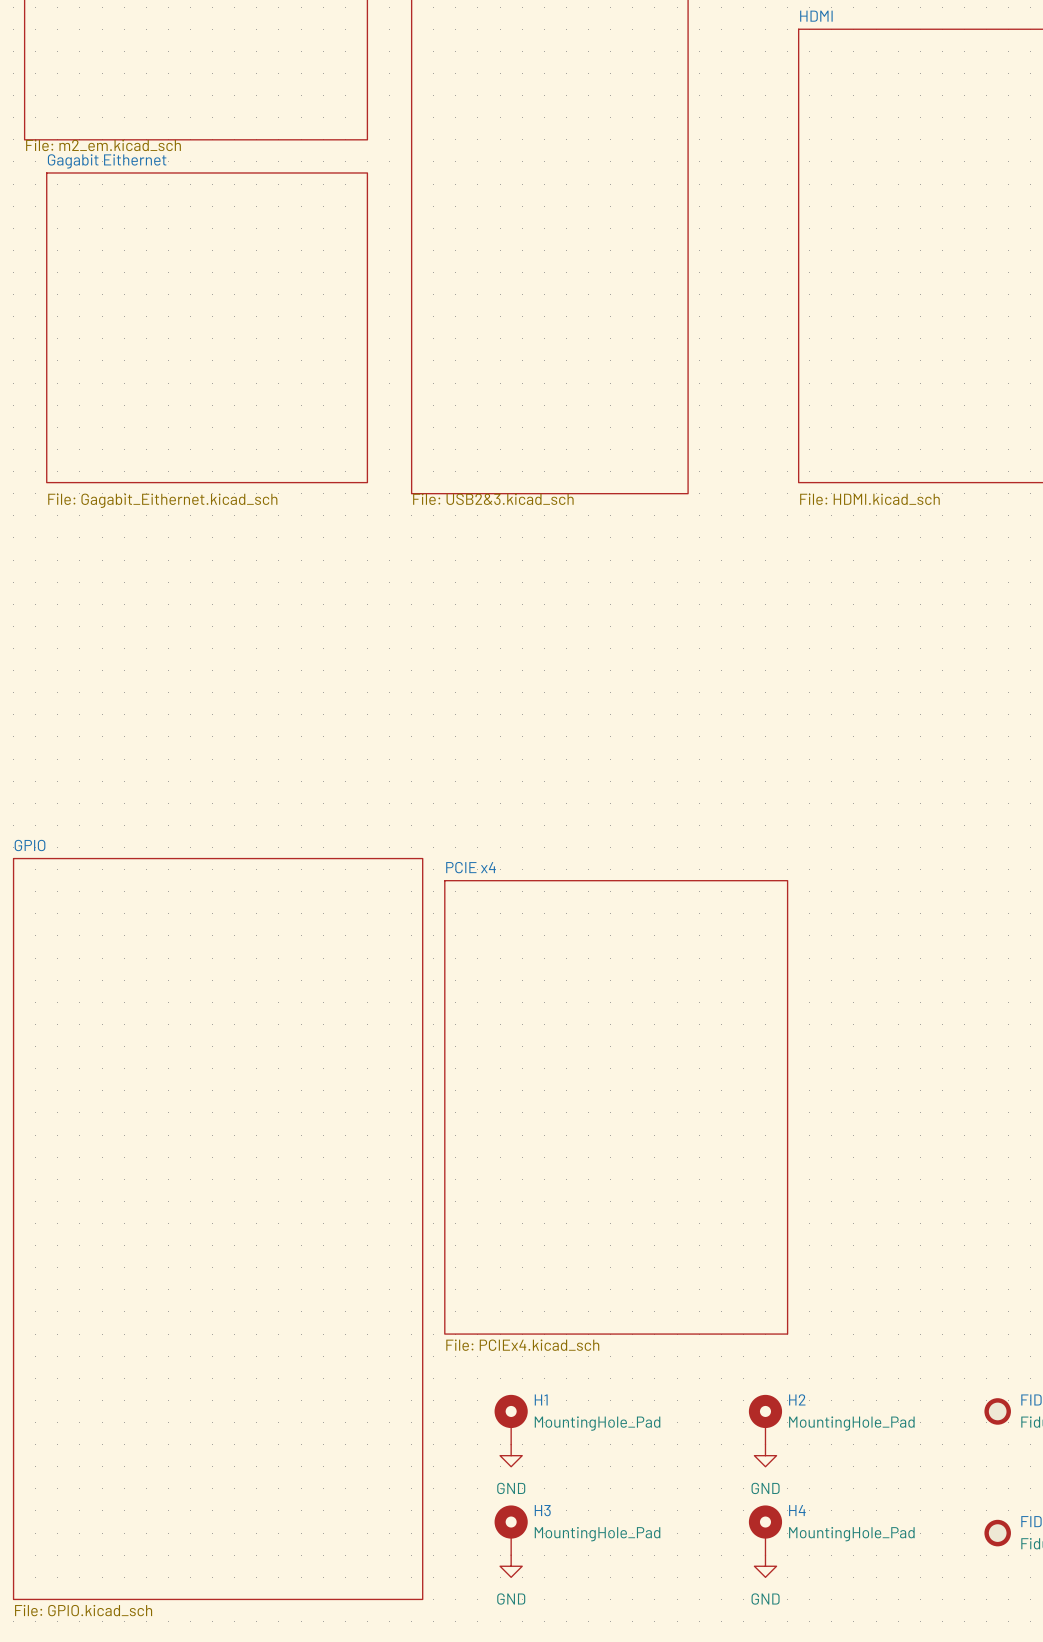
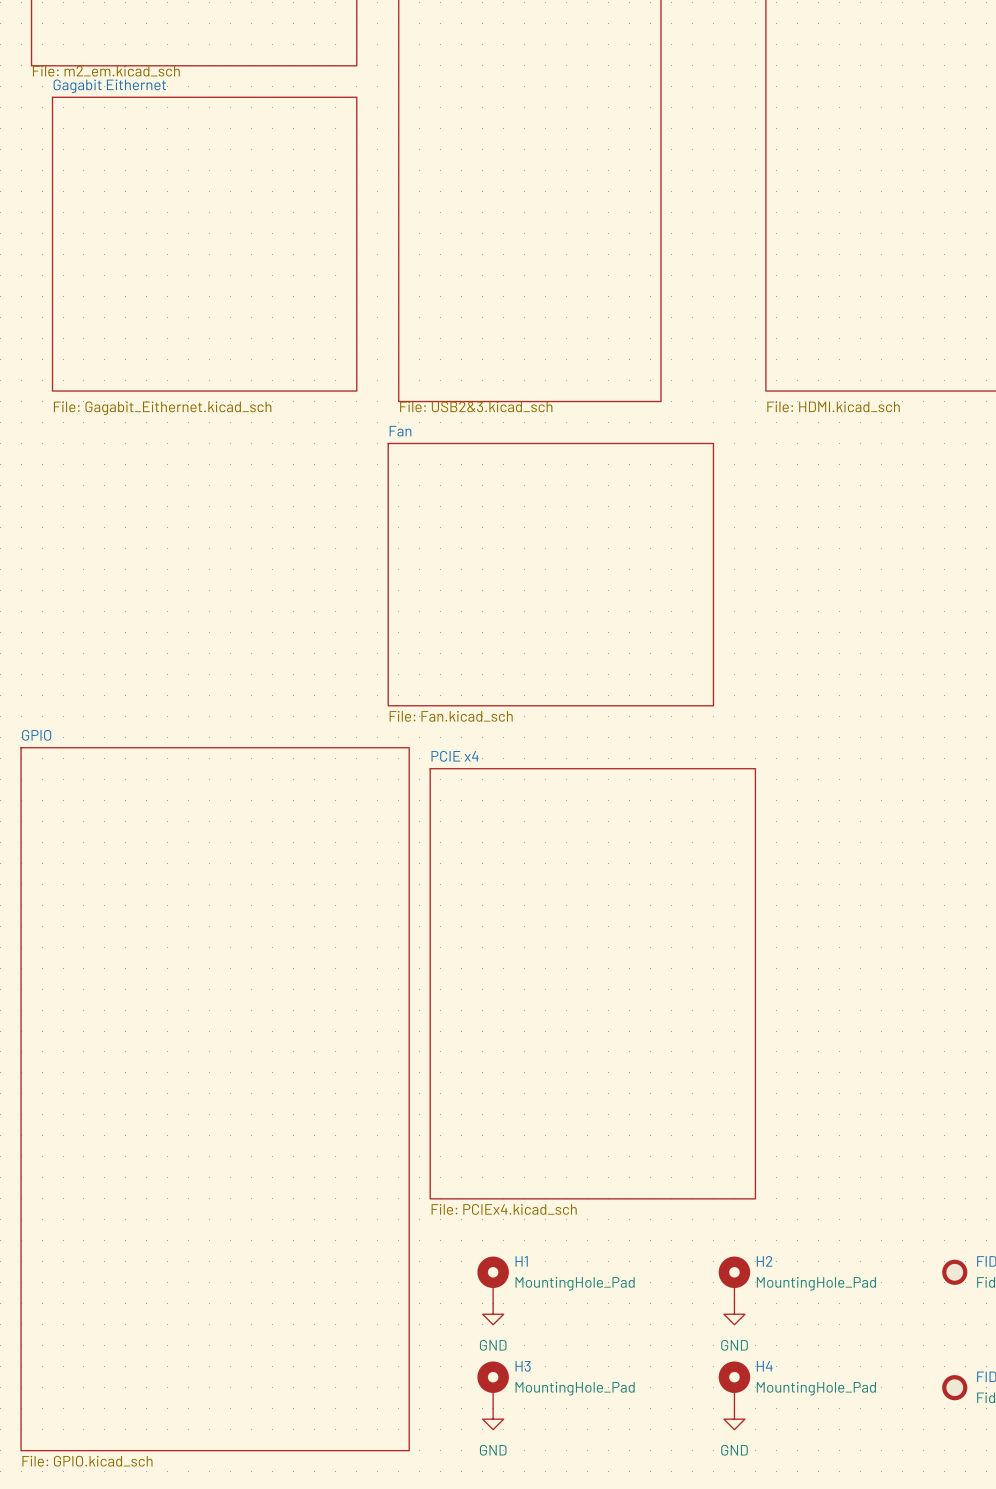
sheet Fan: none -> File: Fan.kicad_sch (550, 574)

